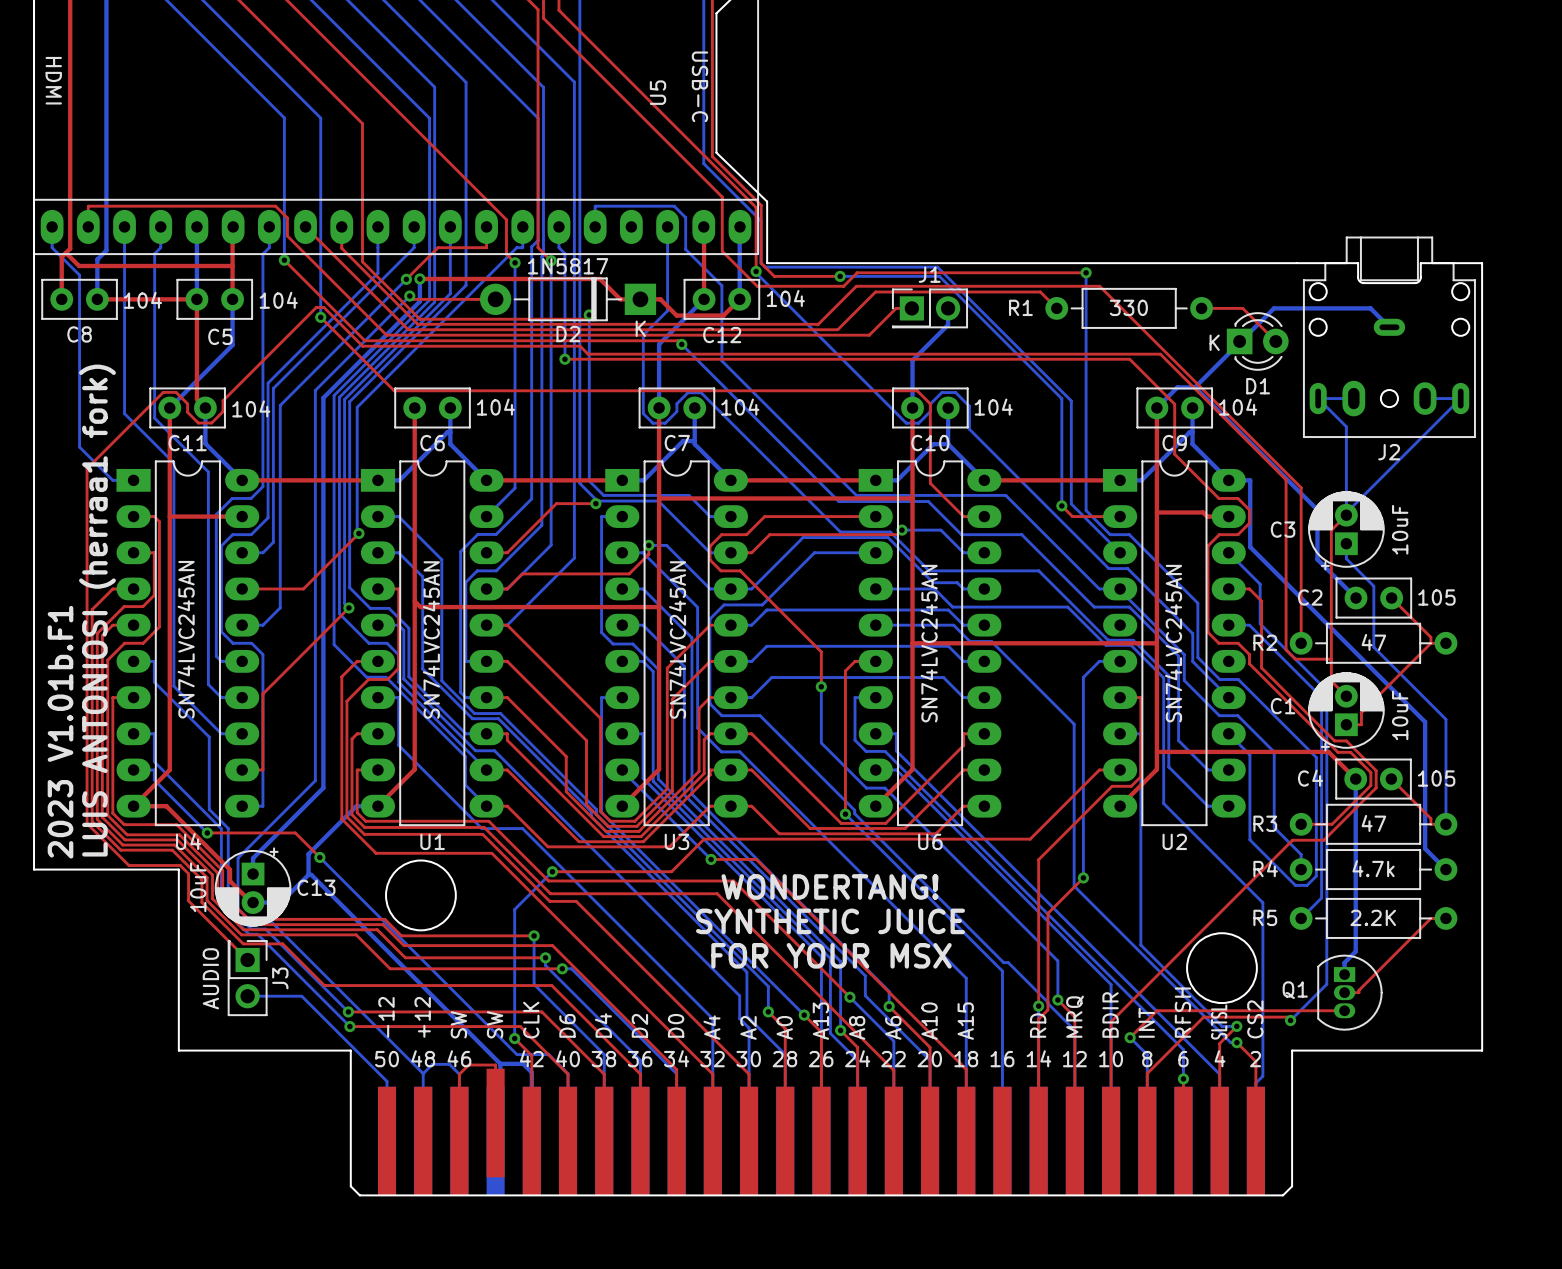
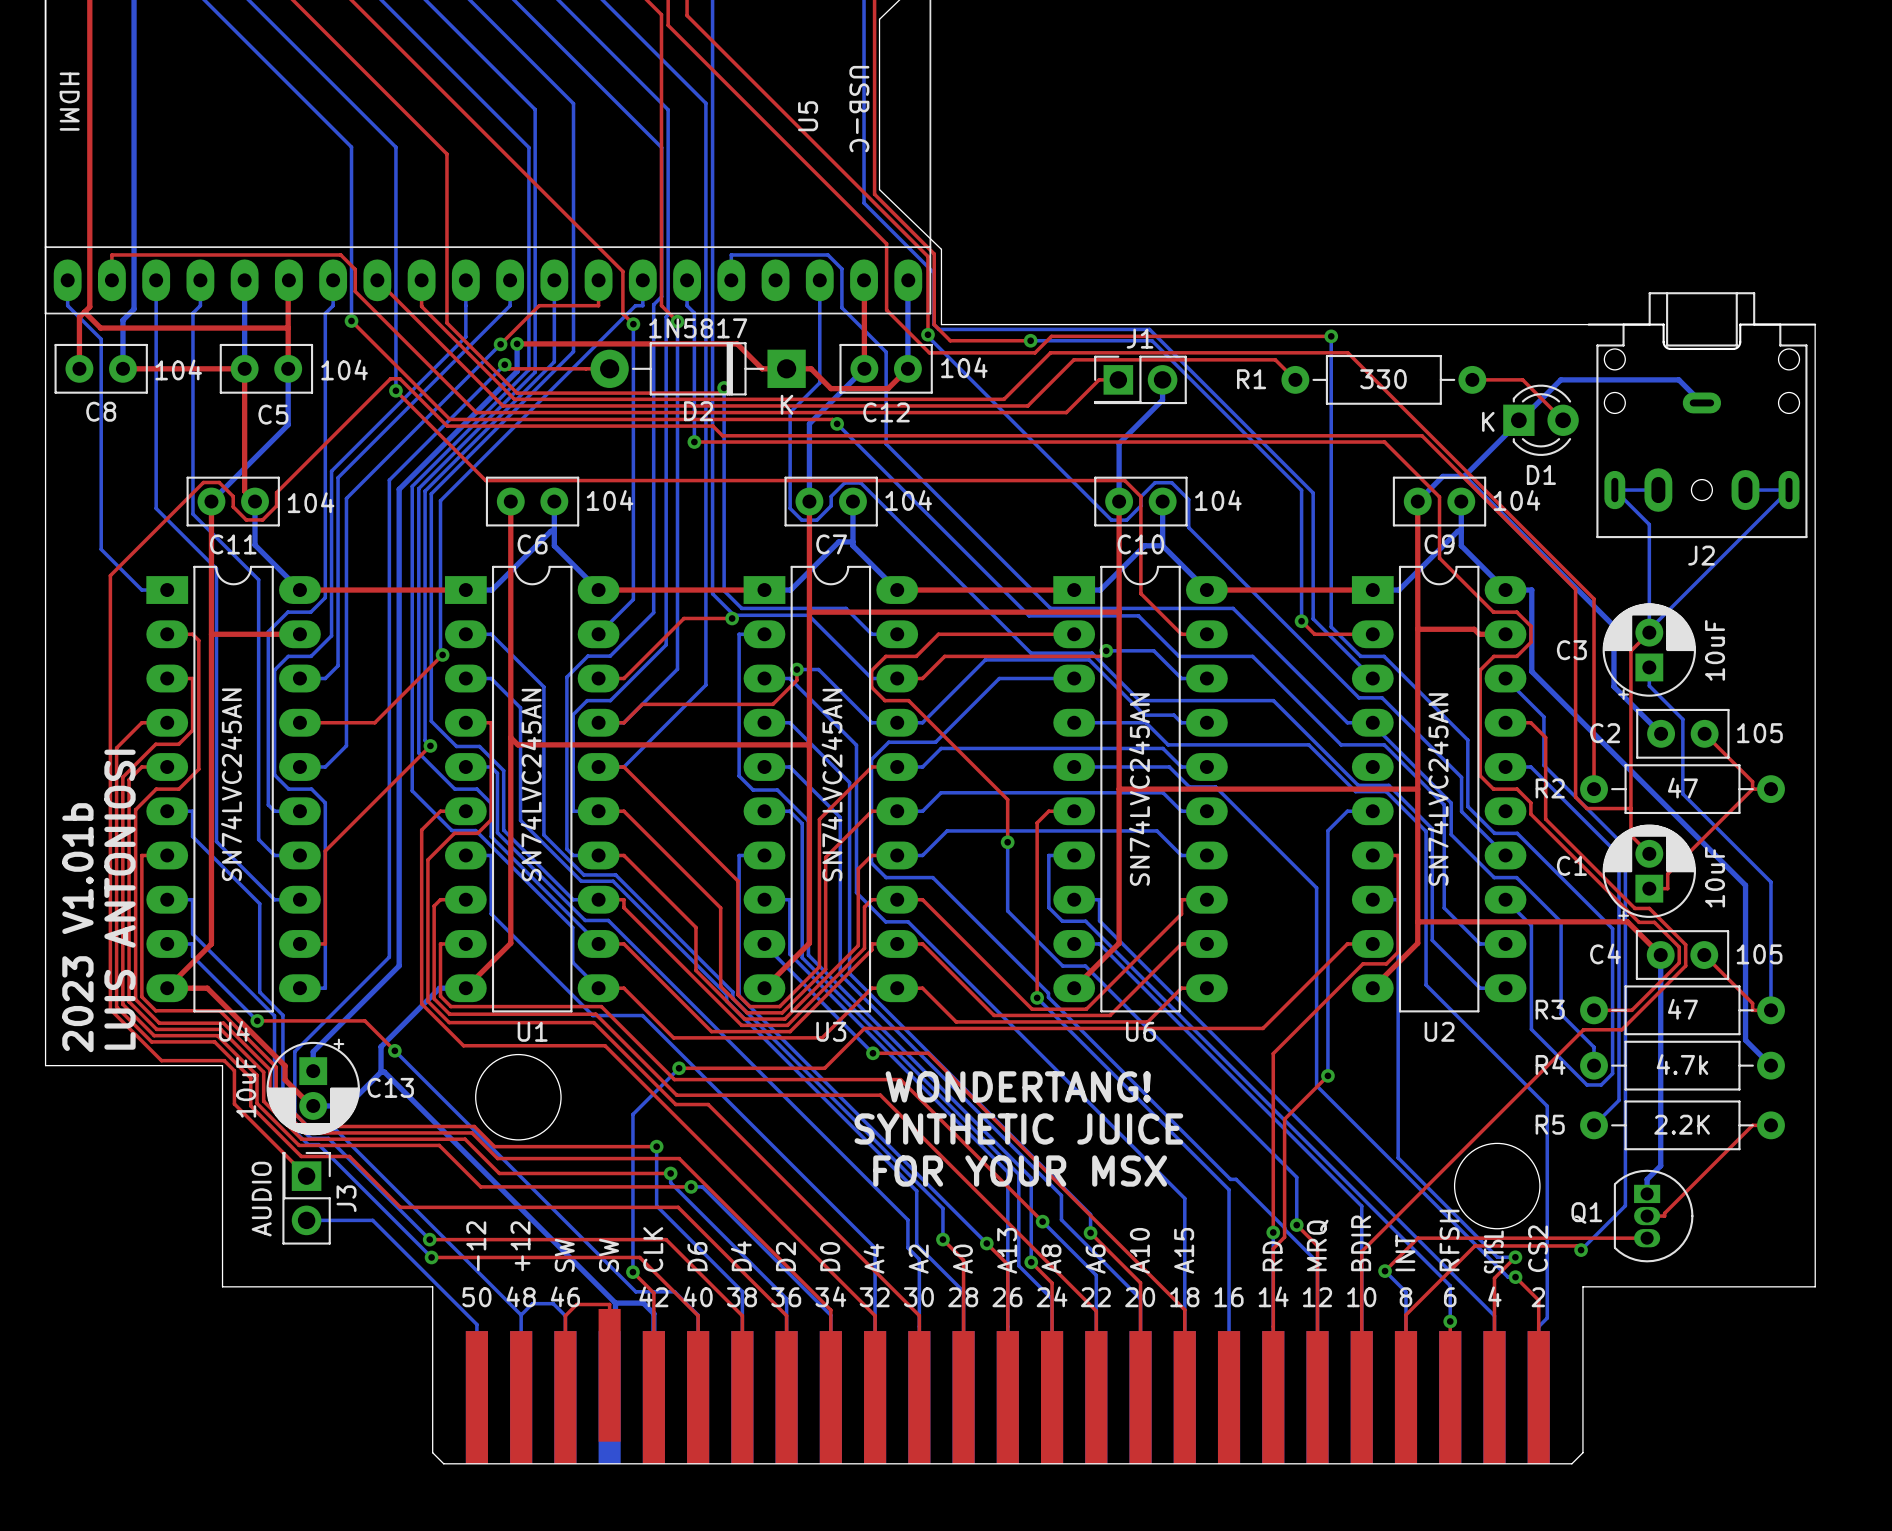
text: LUIS ANTONIOSI (herraa1 fork) (97, 610) -> LUIS ANTONIOSI (119, 899)
text: 2023 V1.01b.F1 (60, 732) -> 2023 V1.01b (77, 927)

